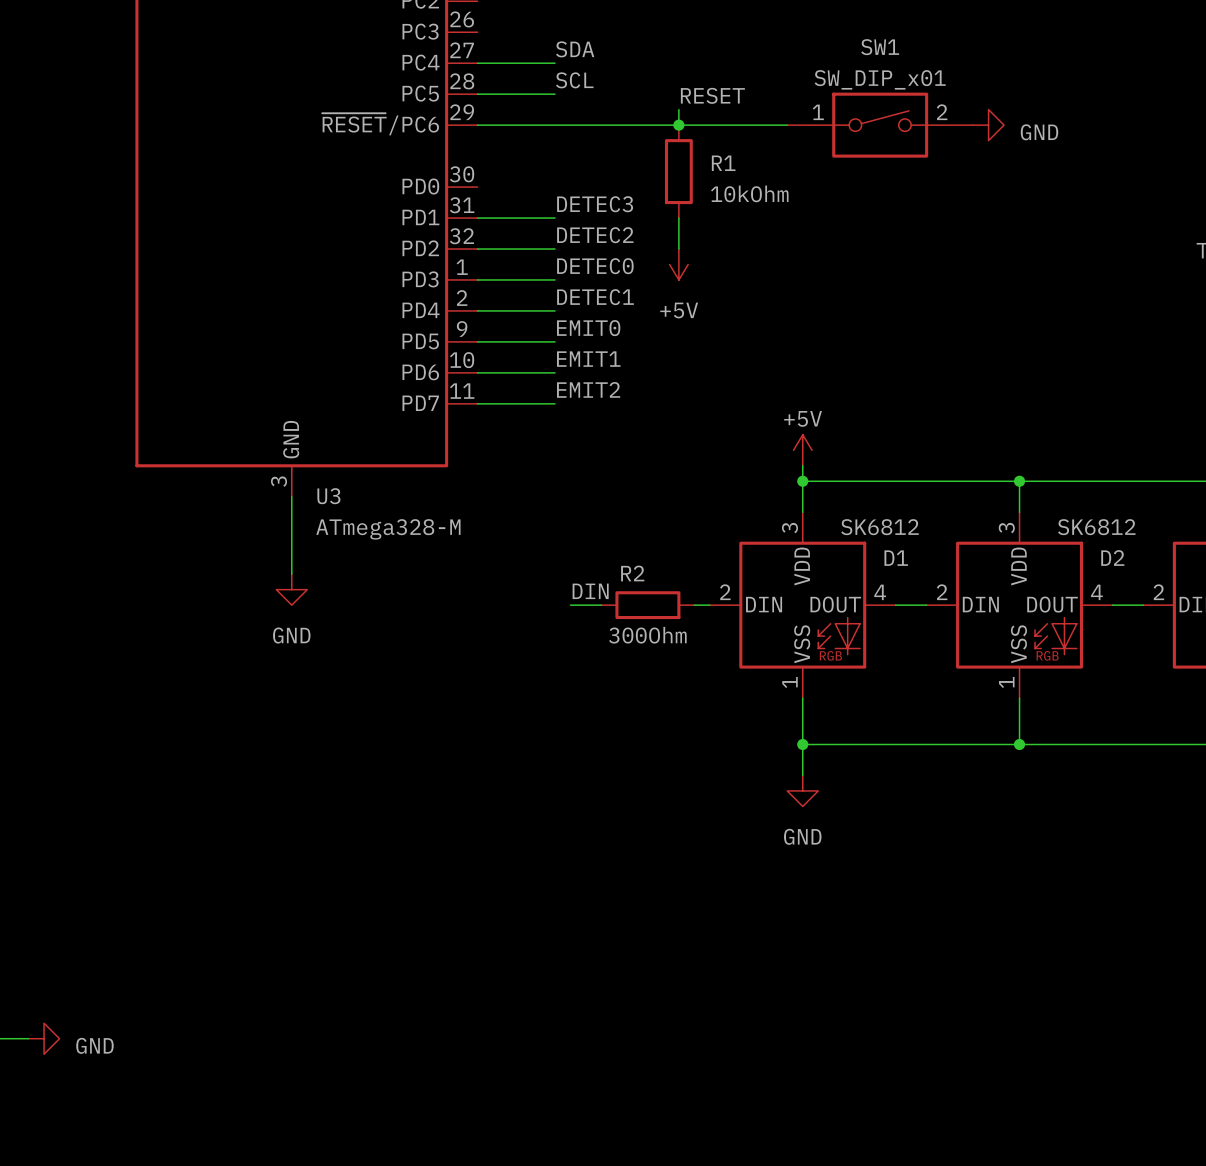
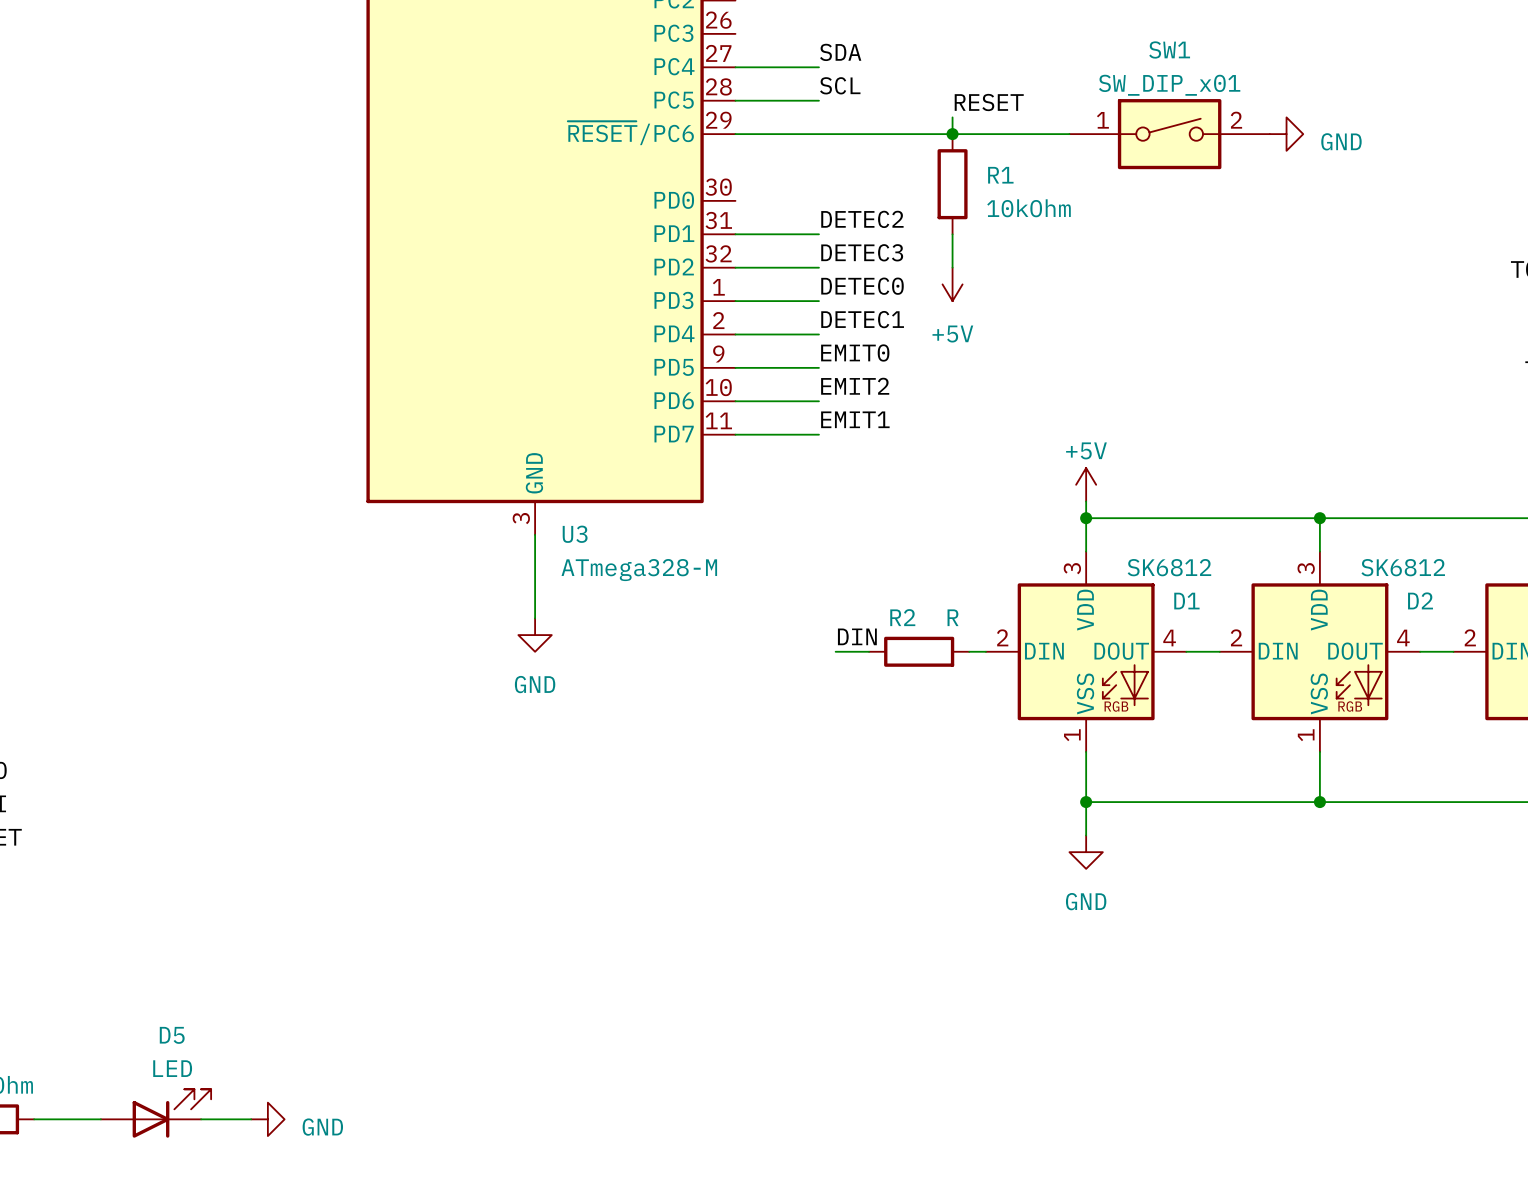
label: DETEC3 (595, 204) -> DETEC2 (862, 219)
label: DETEC2 (595, 235) -> DETEC3 (862, 252)
label: EMIT1 (588, 359) -> EMIT2 (855, 386)
label: EMIT2 (588, 389) -> EMIT1 (855, 419)
R2 value: 300Ohm (647, 635) -> R (953, 617)

